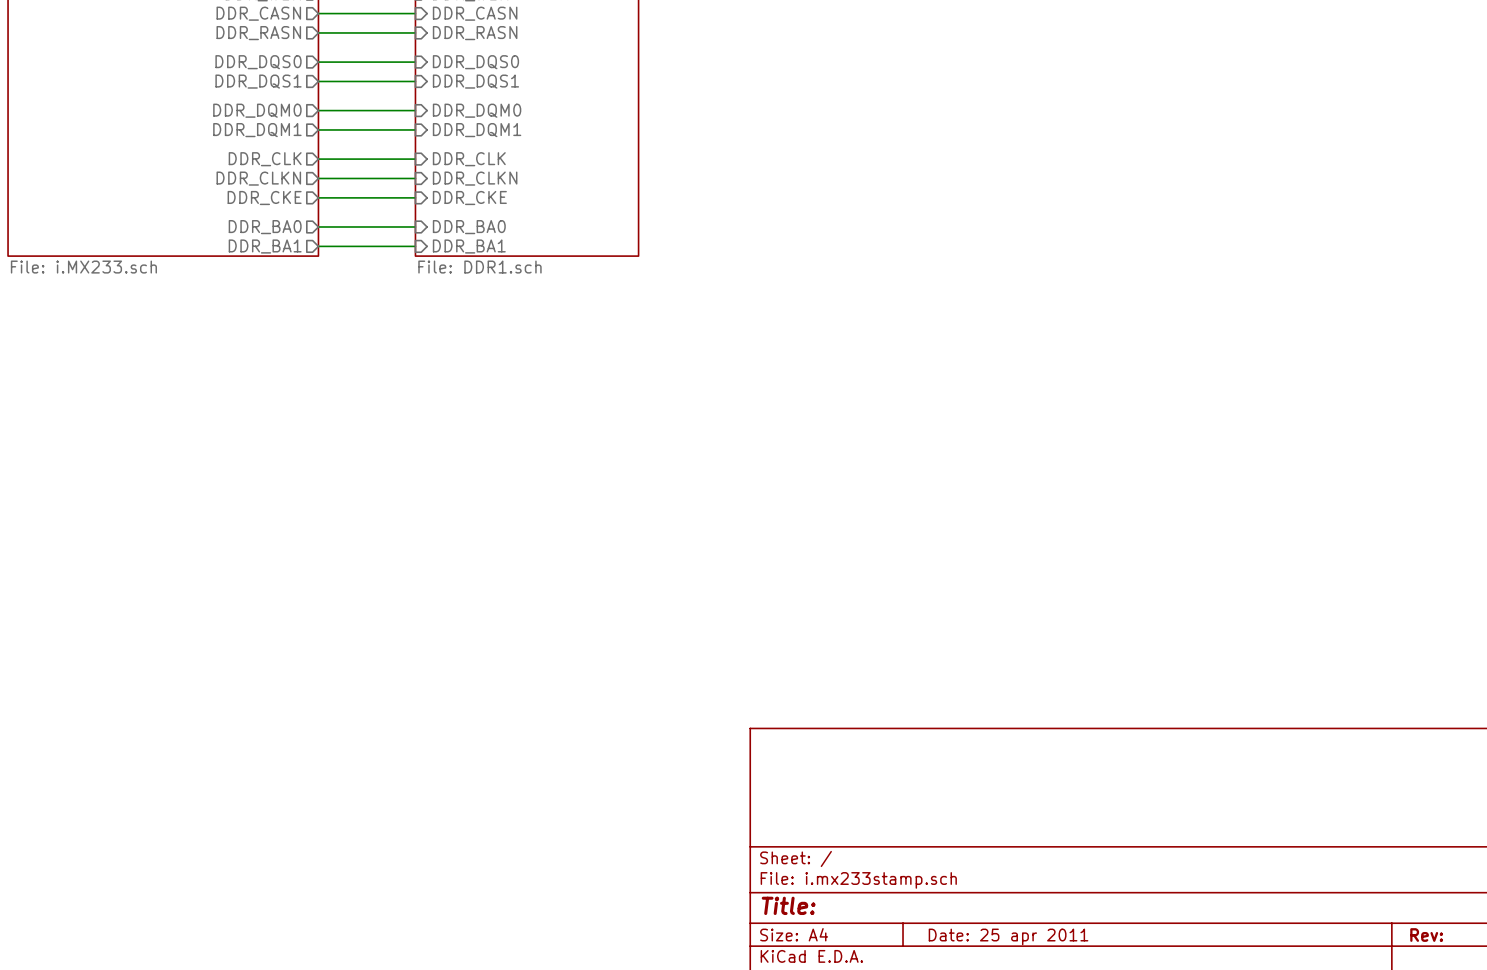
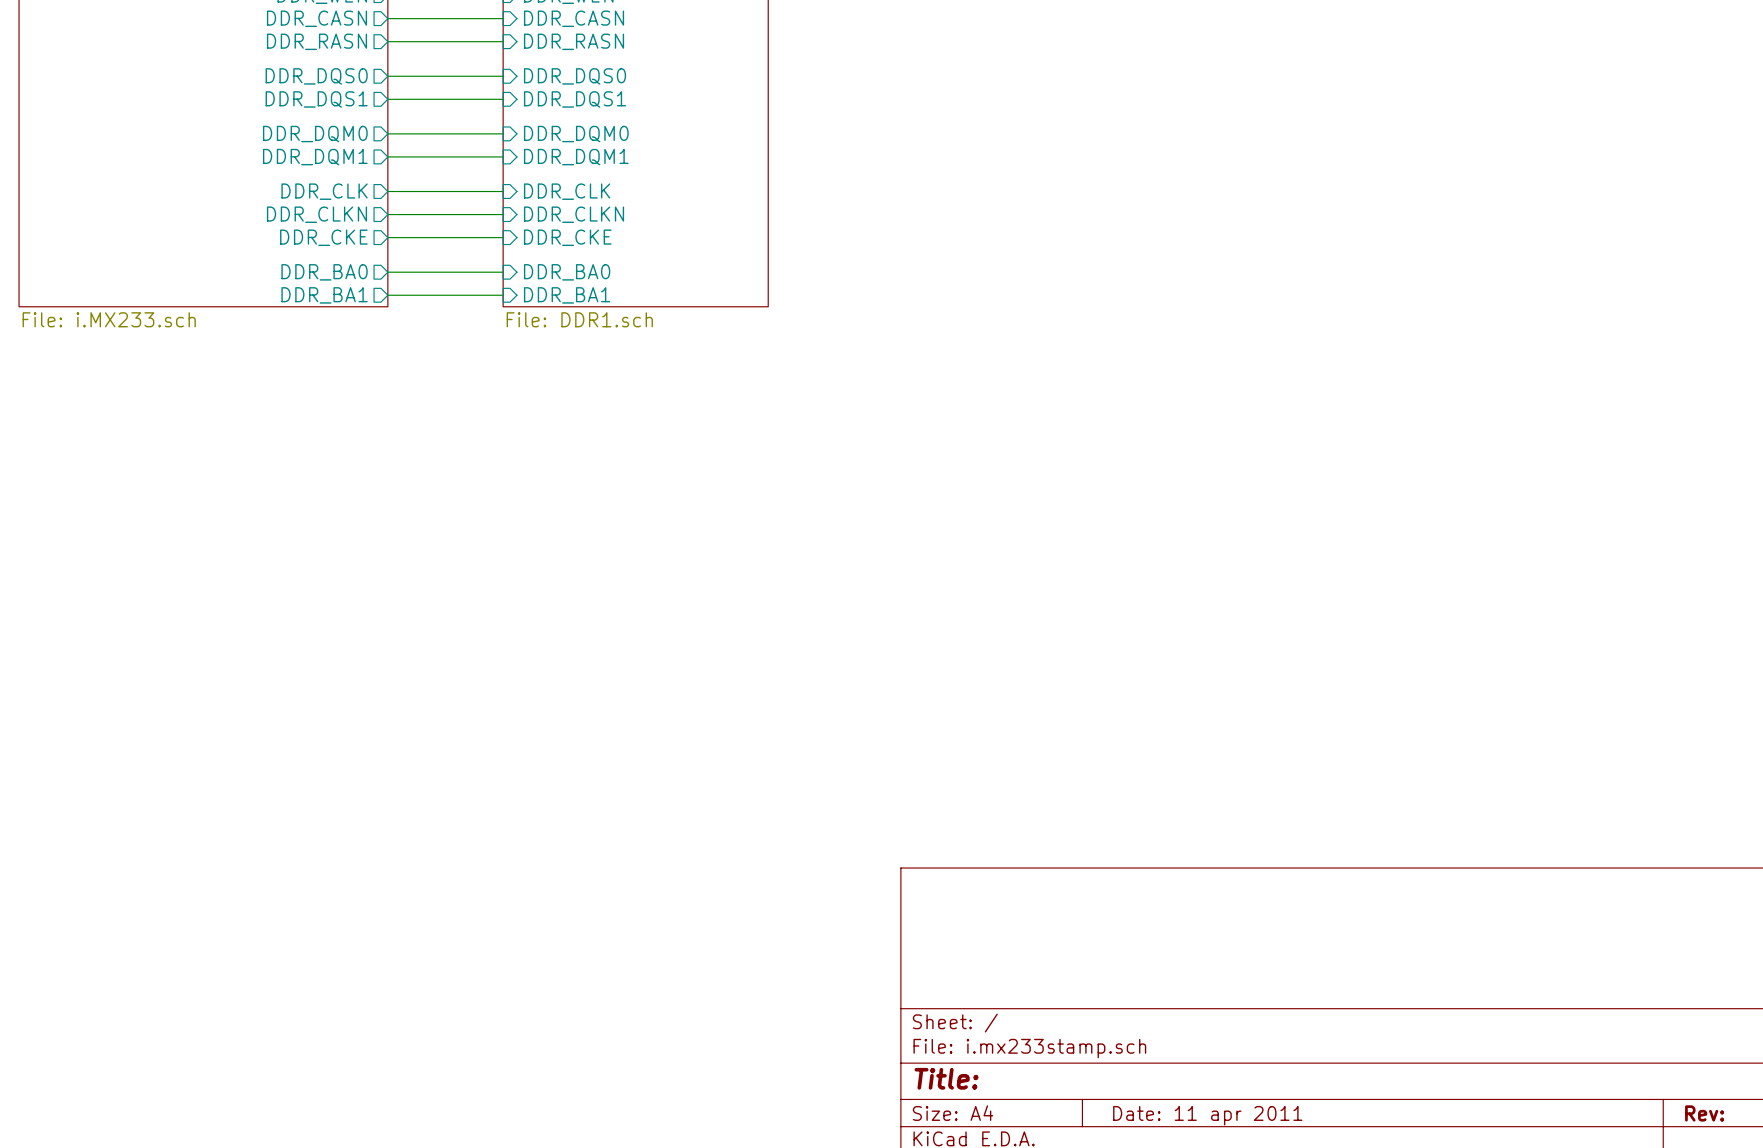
title block: Date: 25 apr 2011 (1008, 936) -> Date: 11 apr 2011 (1207, 1115)

